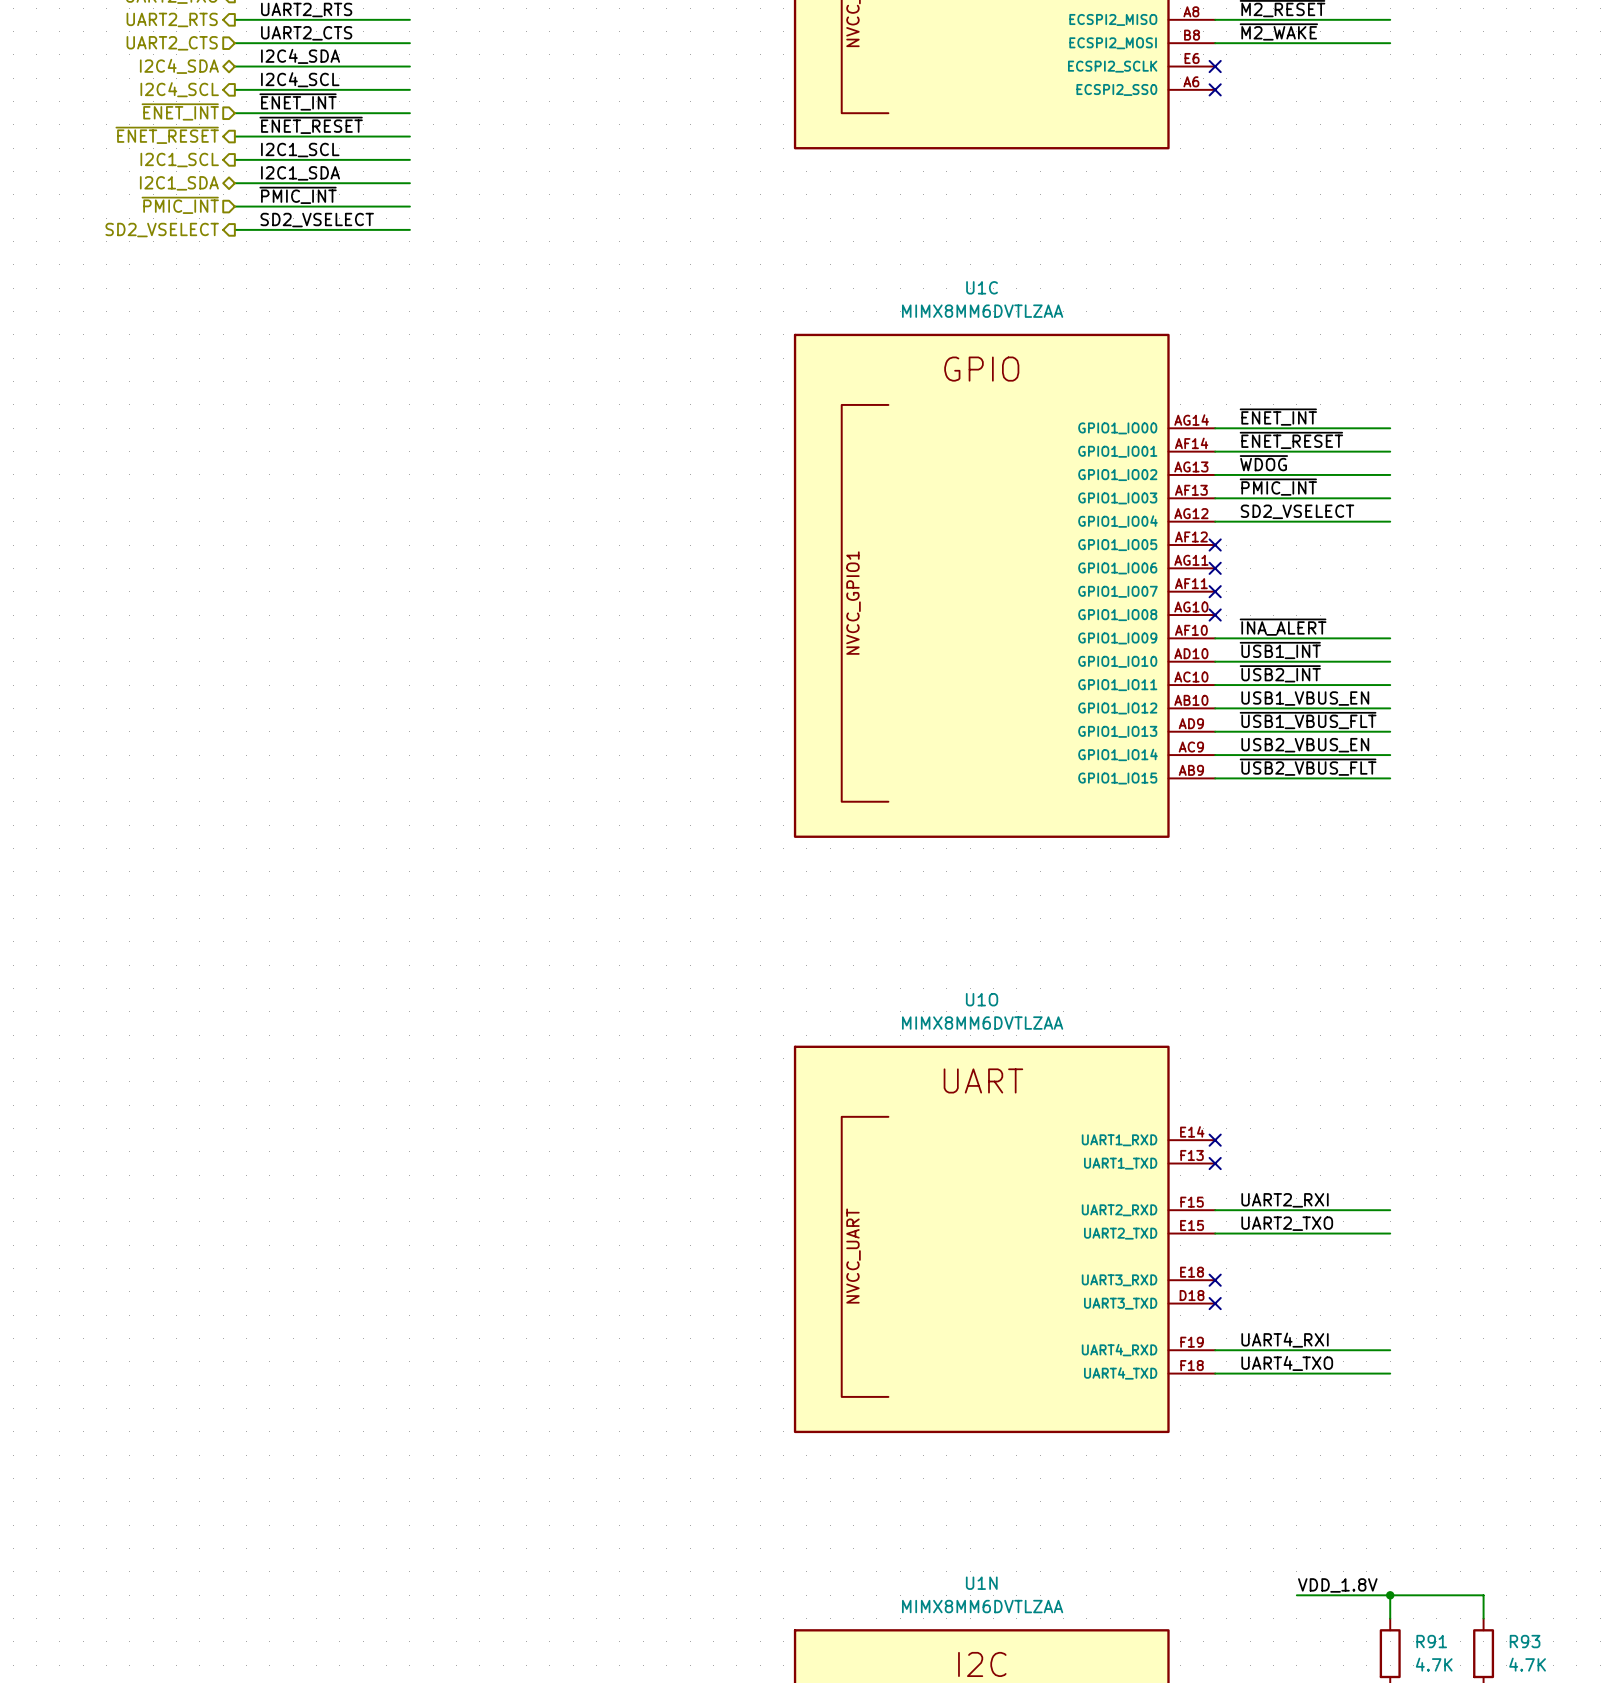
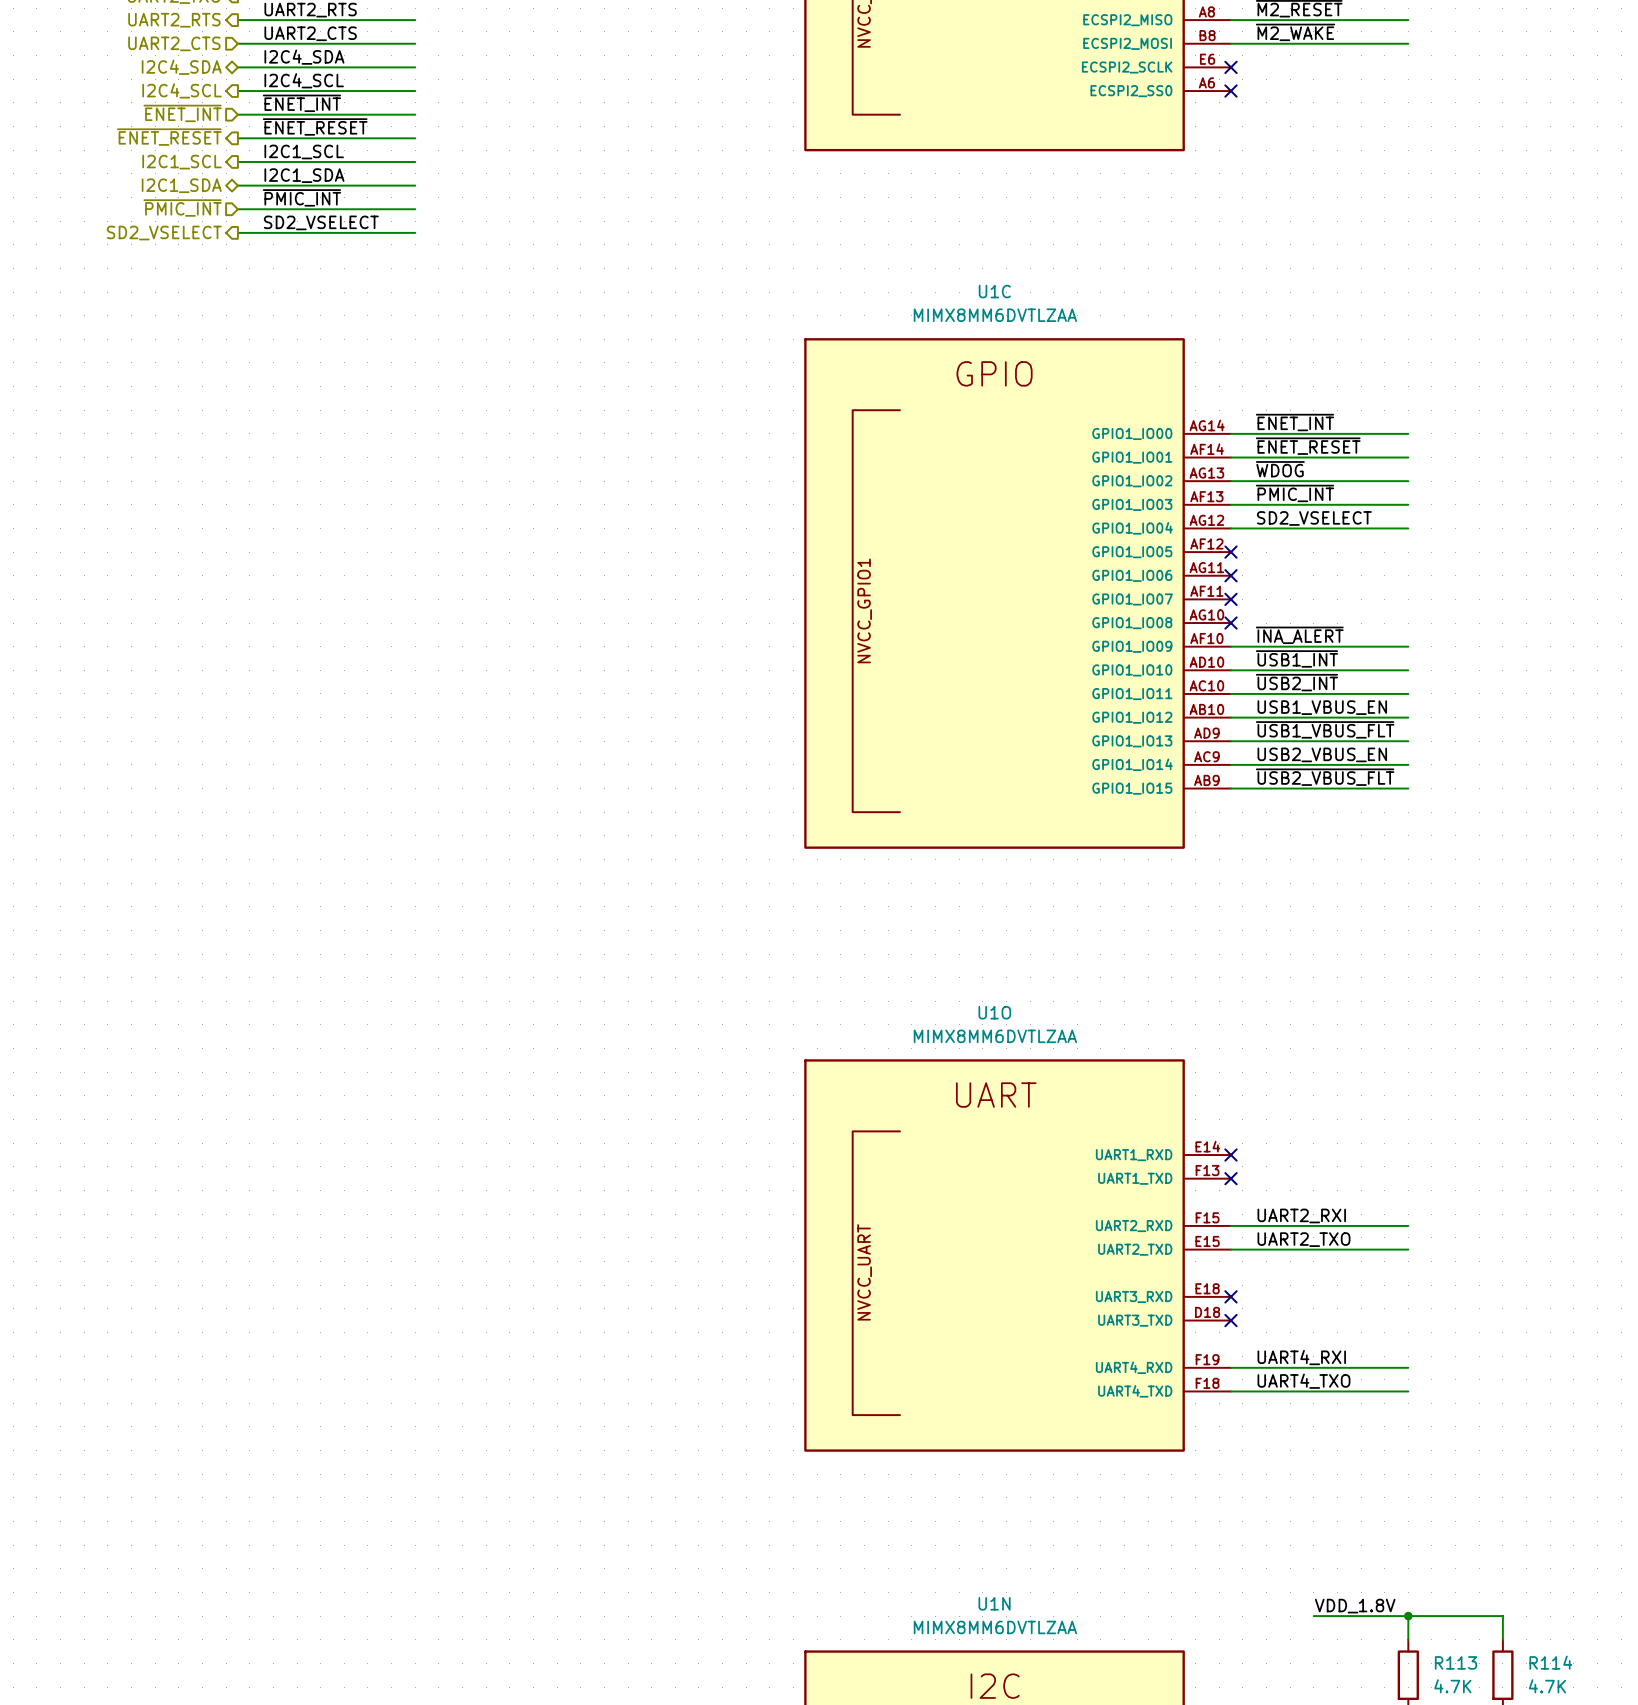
R91 name: R91 (1431, 1641) -> R113 (1455, 1662)
R93 name: R93 (1525, 1641) -> R114 (1550, 1662)

